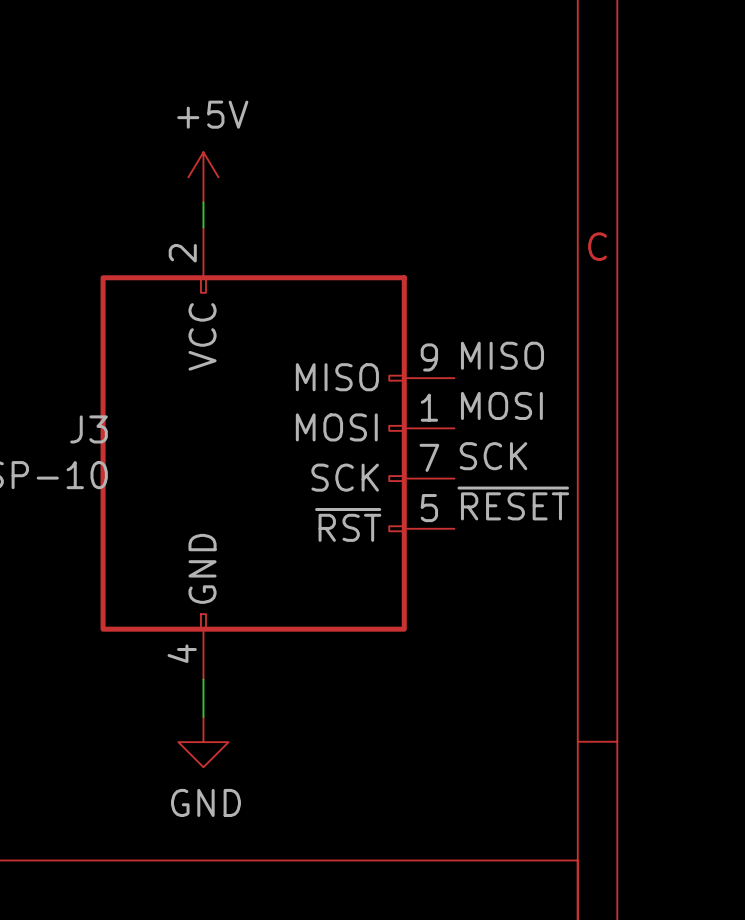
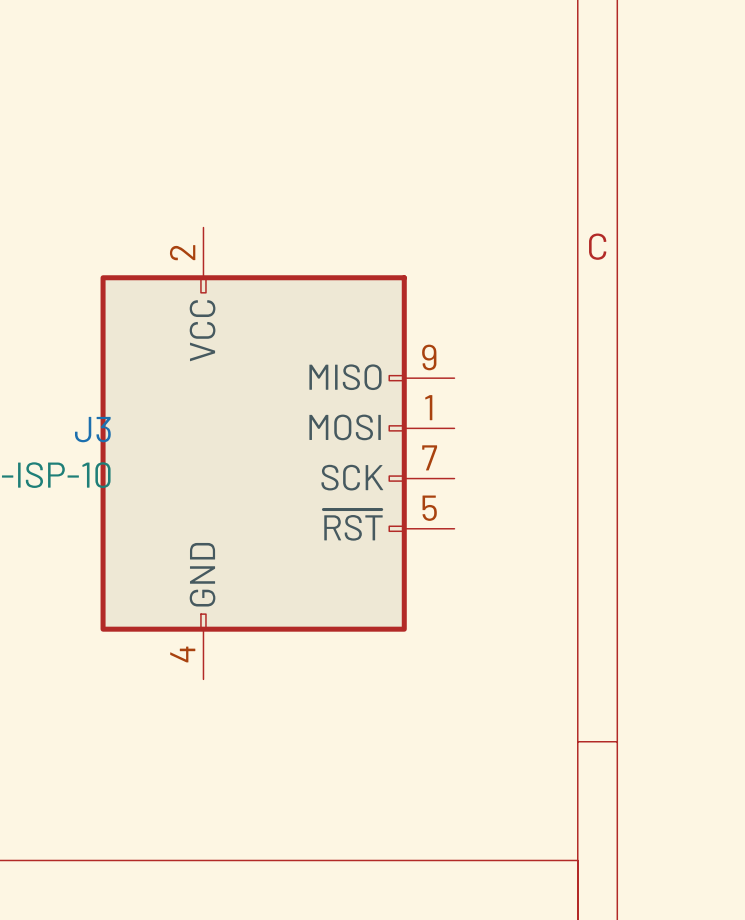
power symbol: +5V (203, 177) -> none
wire: (203, 202) (203, 227) -> none
label: MISO (502, 355) -> none
label: MOSI (501, 405) -> none
label: SCK (493, 456) -> none
label: ~{RESET} (513, 503) -> none
wire: (203, 679) (203, 717) -> none
power symbol: GND (203, 742) -> none

